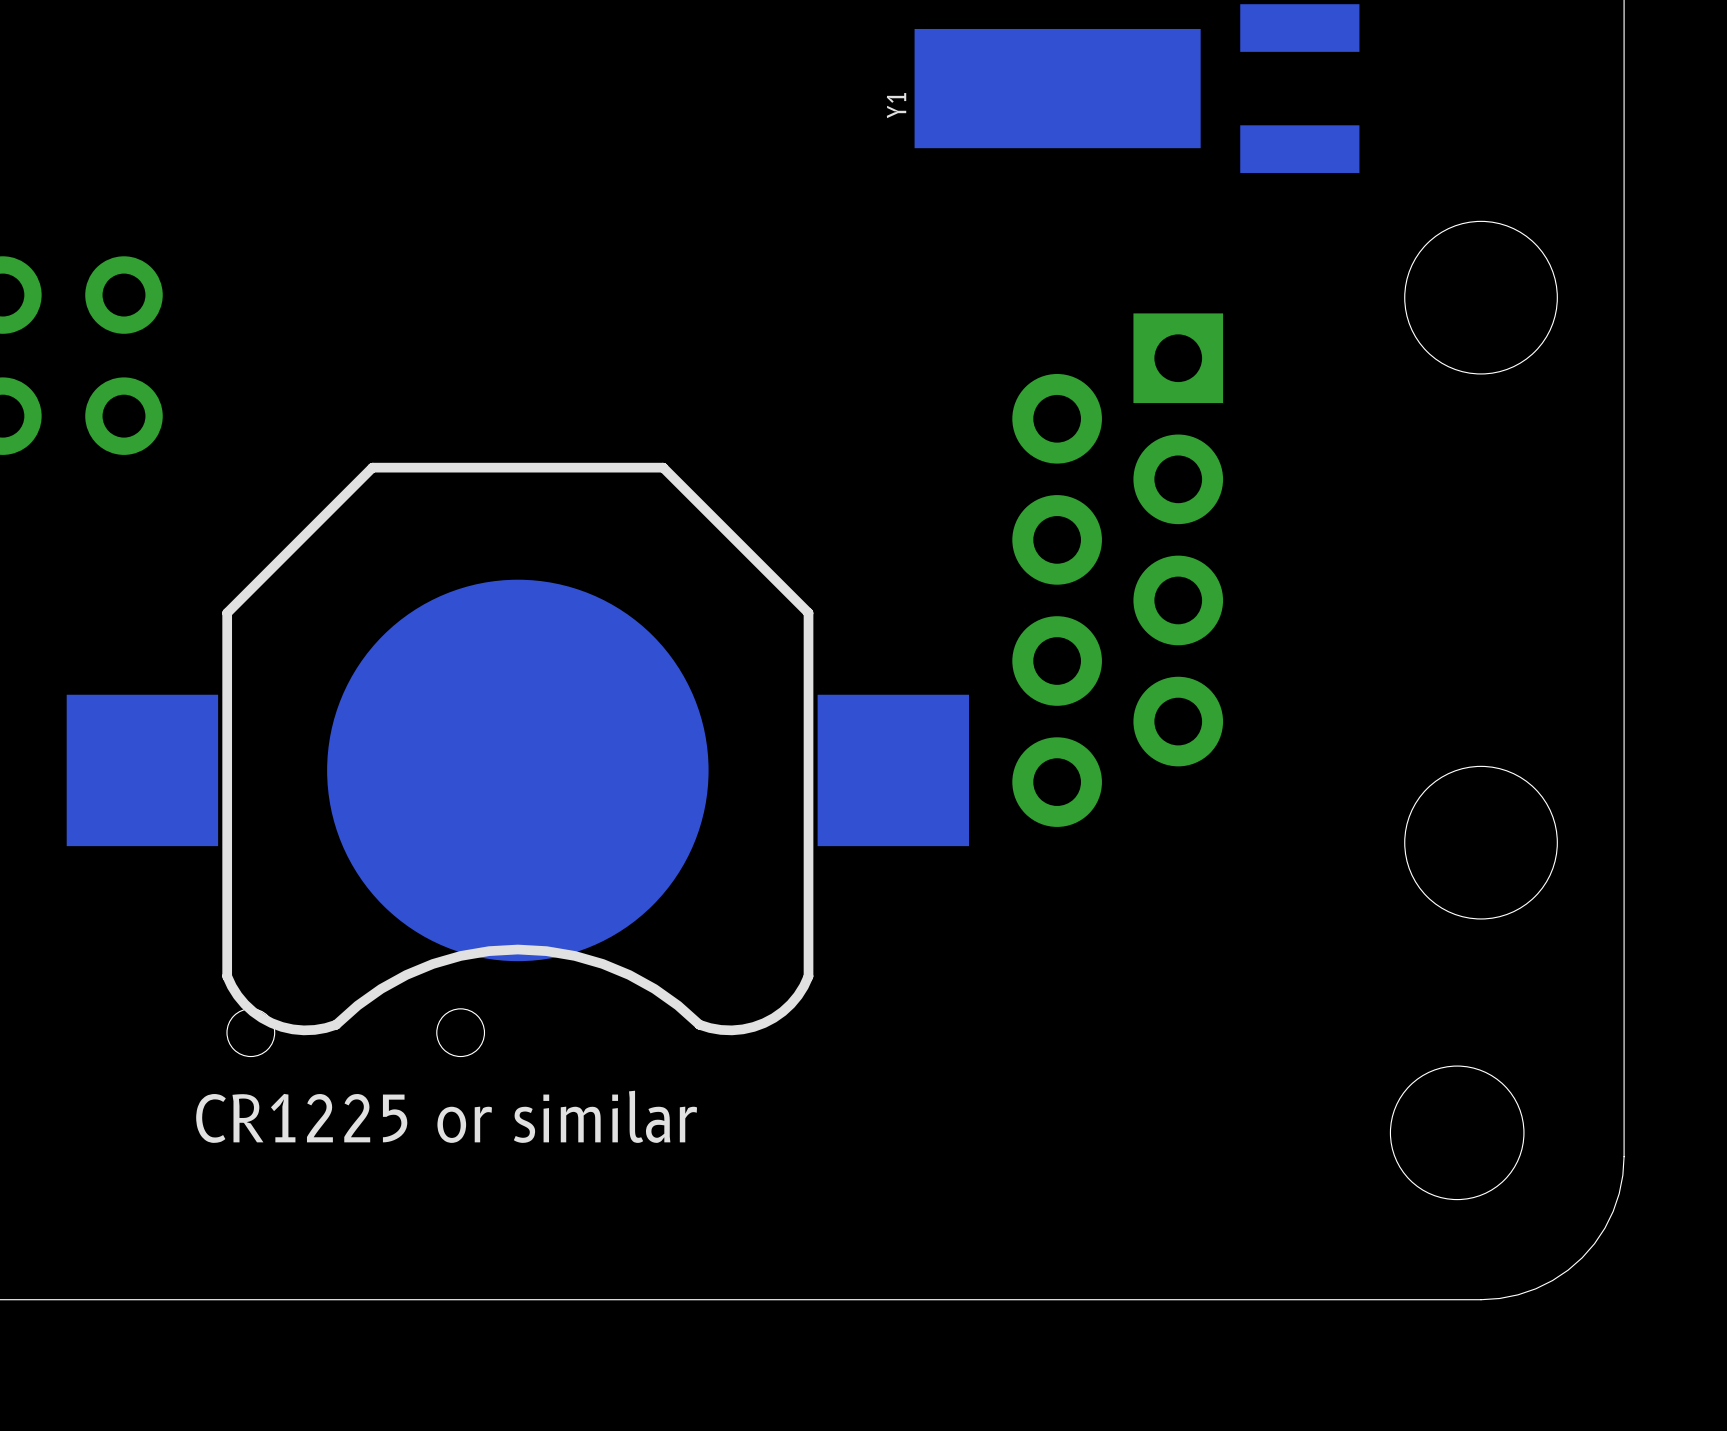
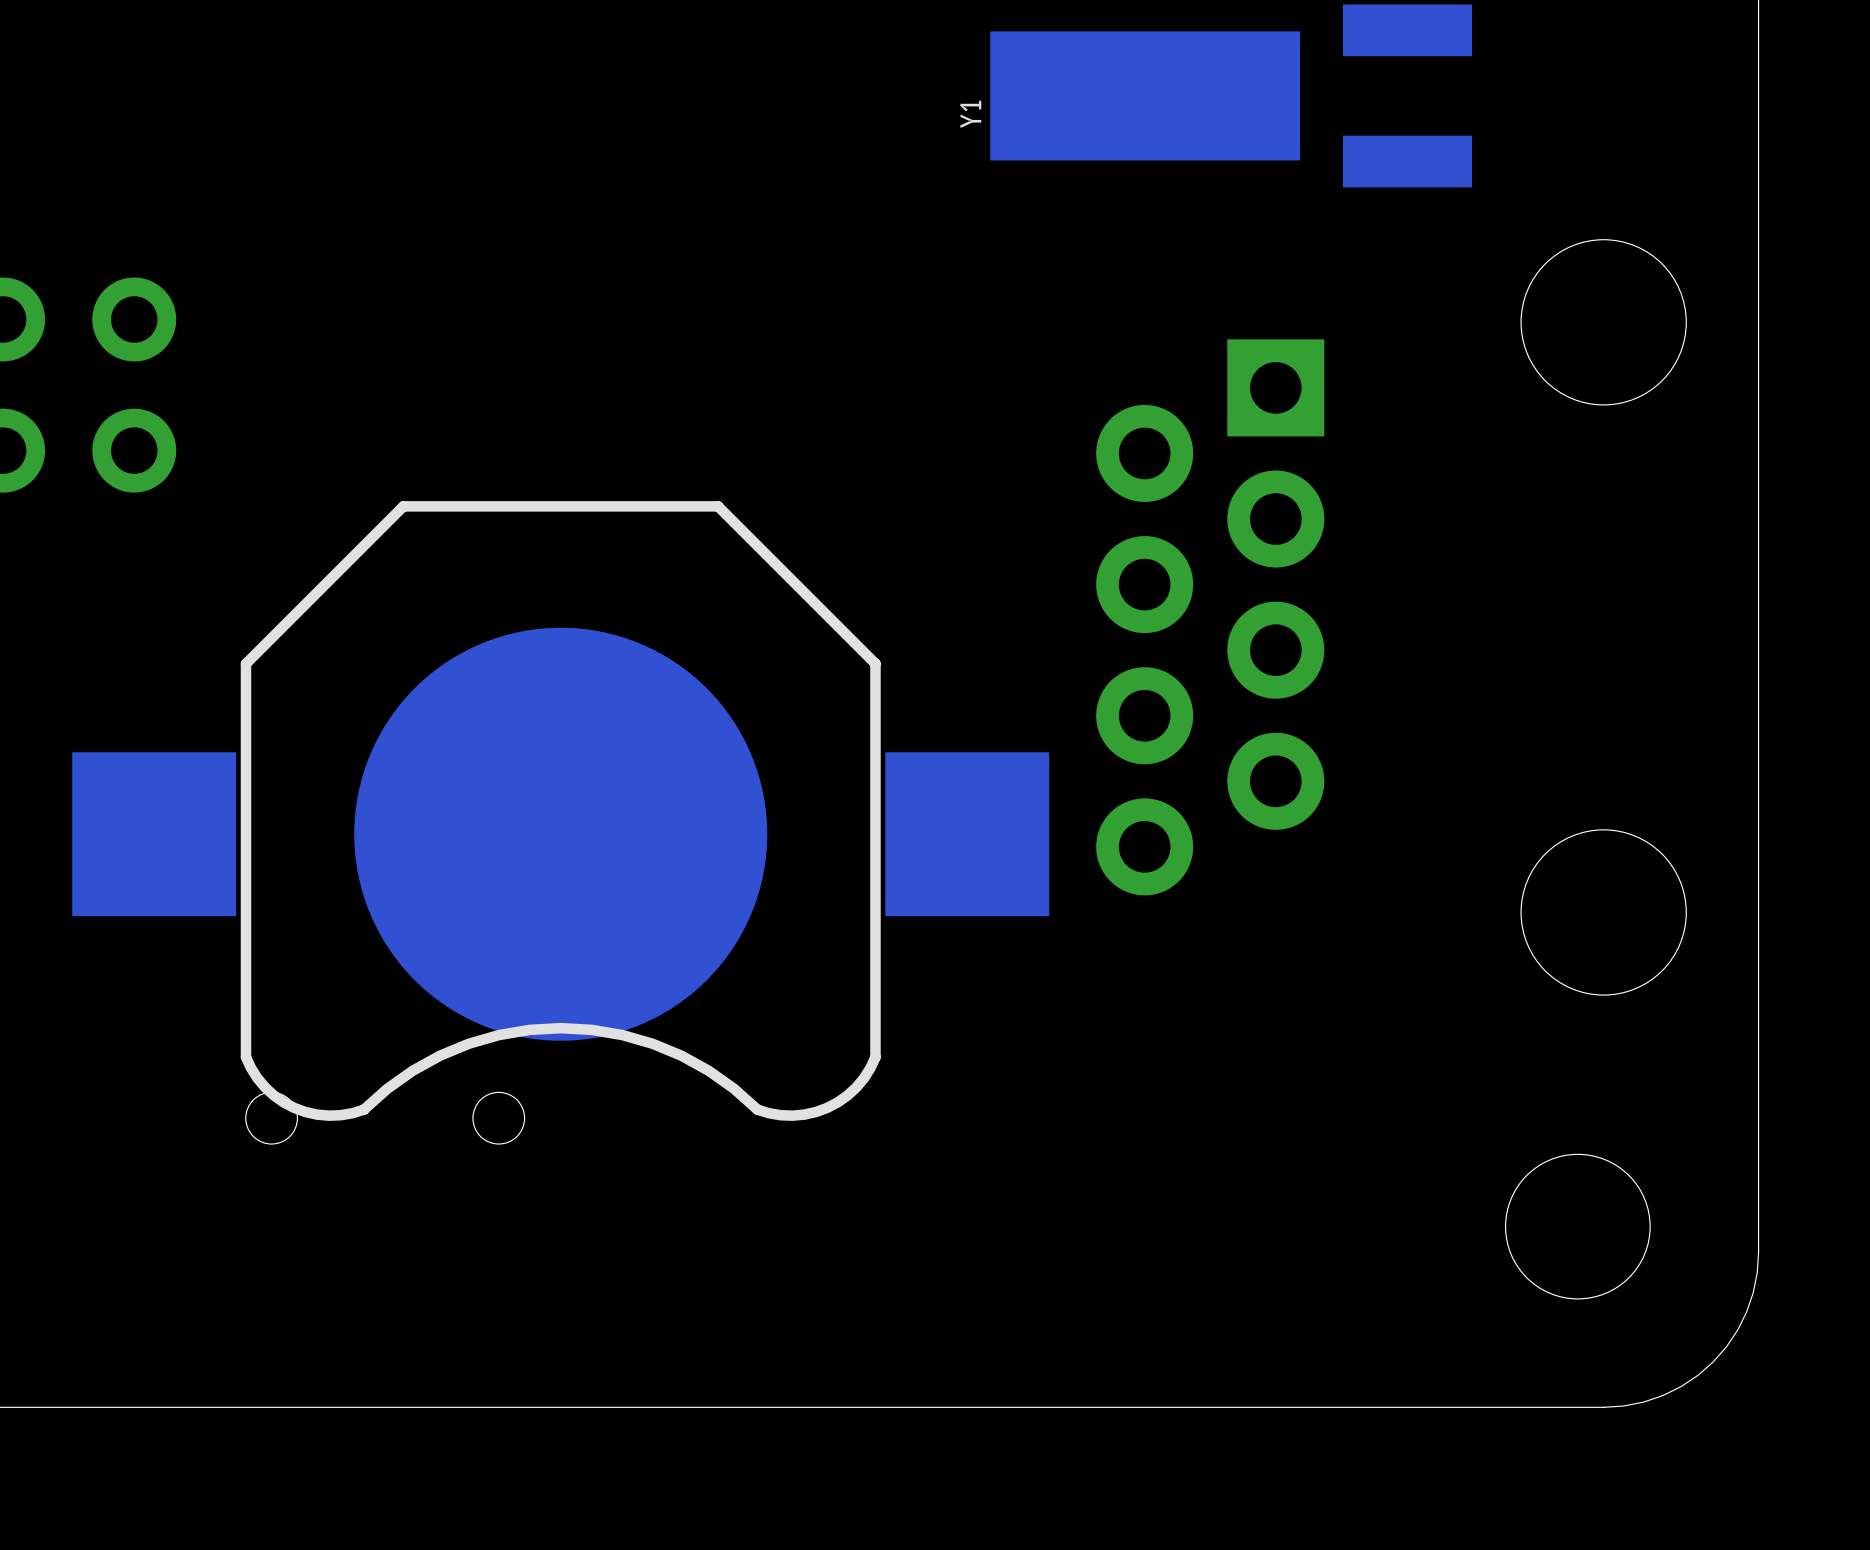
text: CR1225 or similar (446, 1116) -> none

